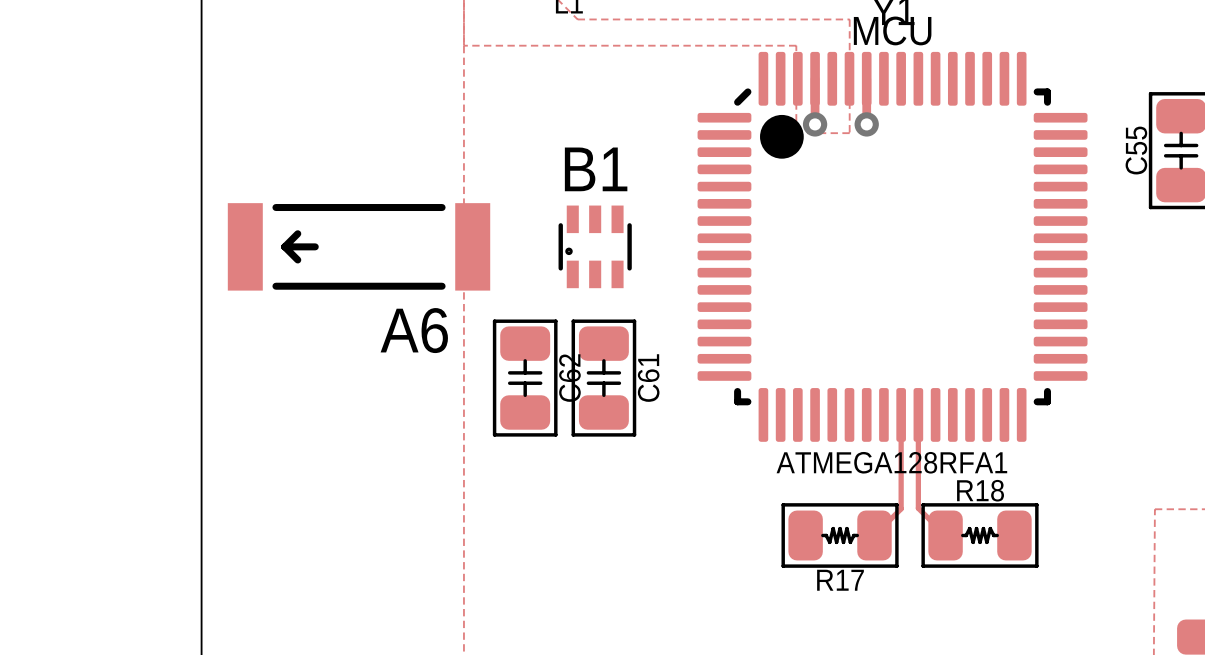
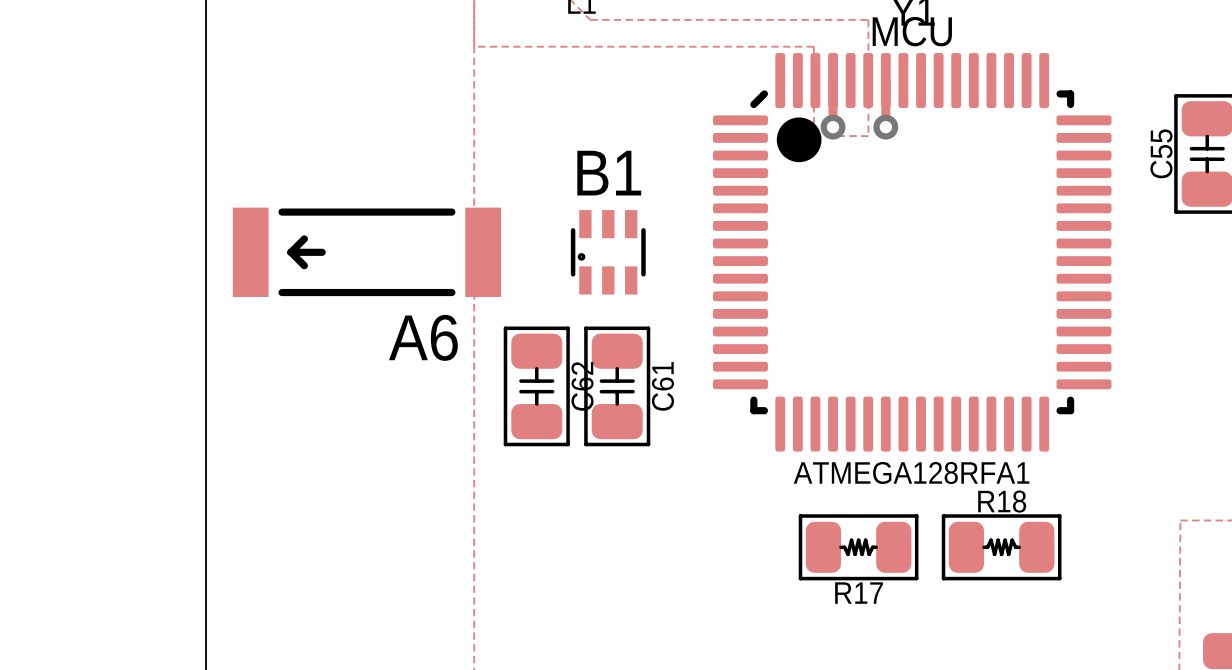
track: (901, 414) (901, 508) (874, 535) -> none
track: (918, 414) (918, 508) (945, 535) -> none

